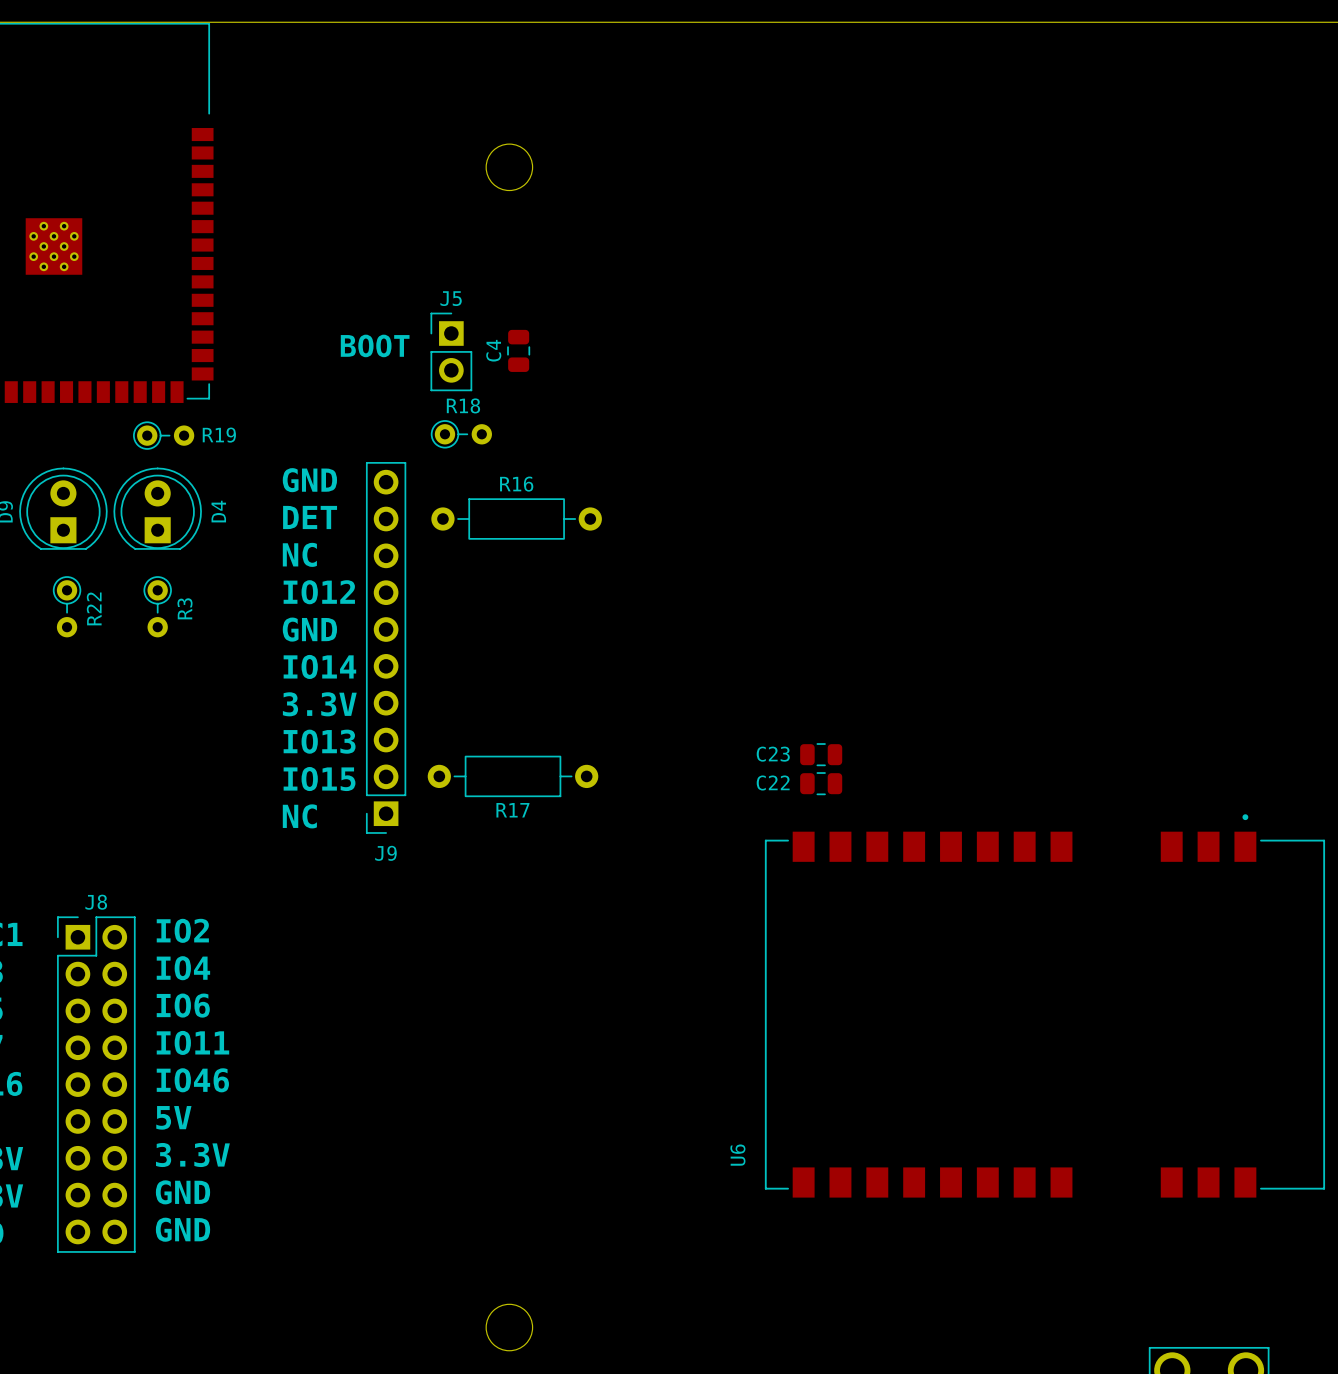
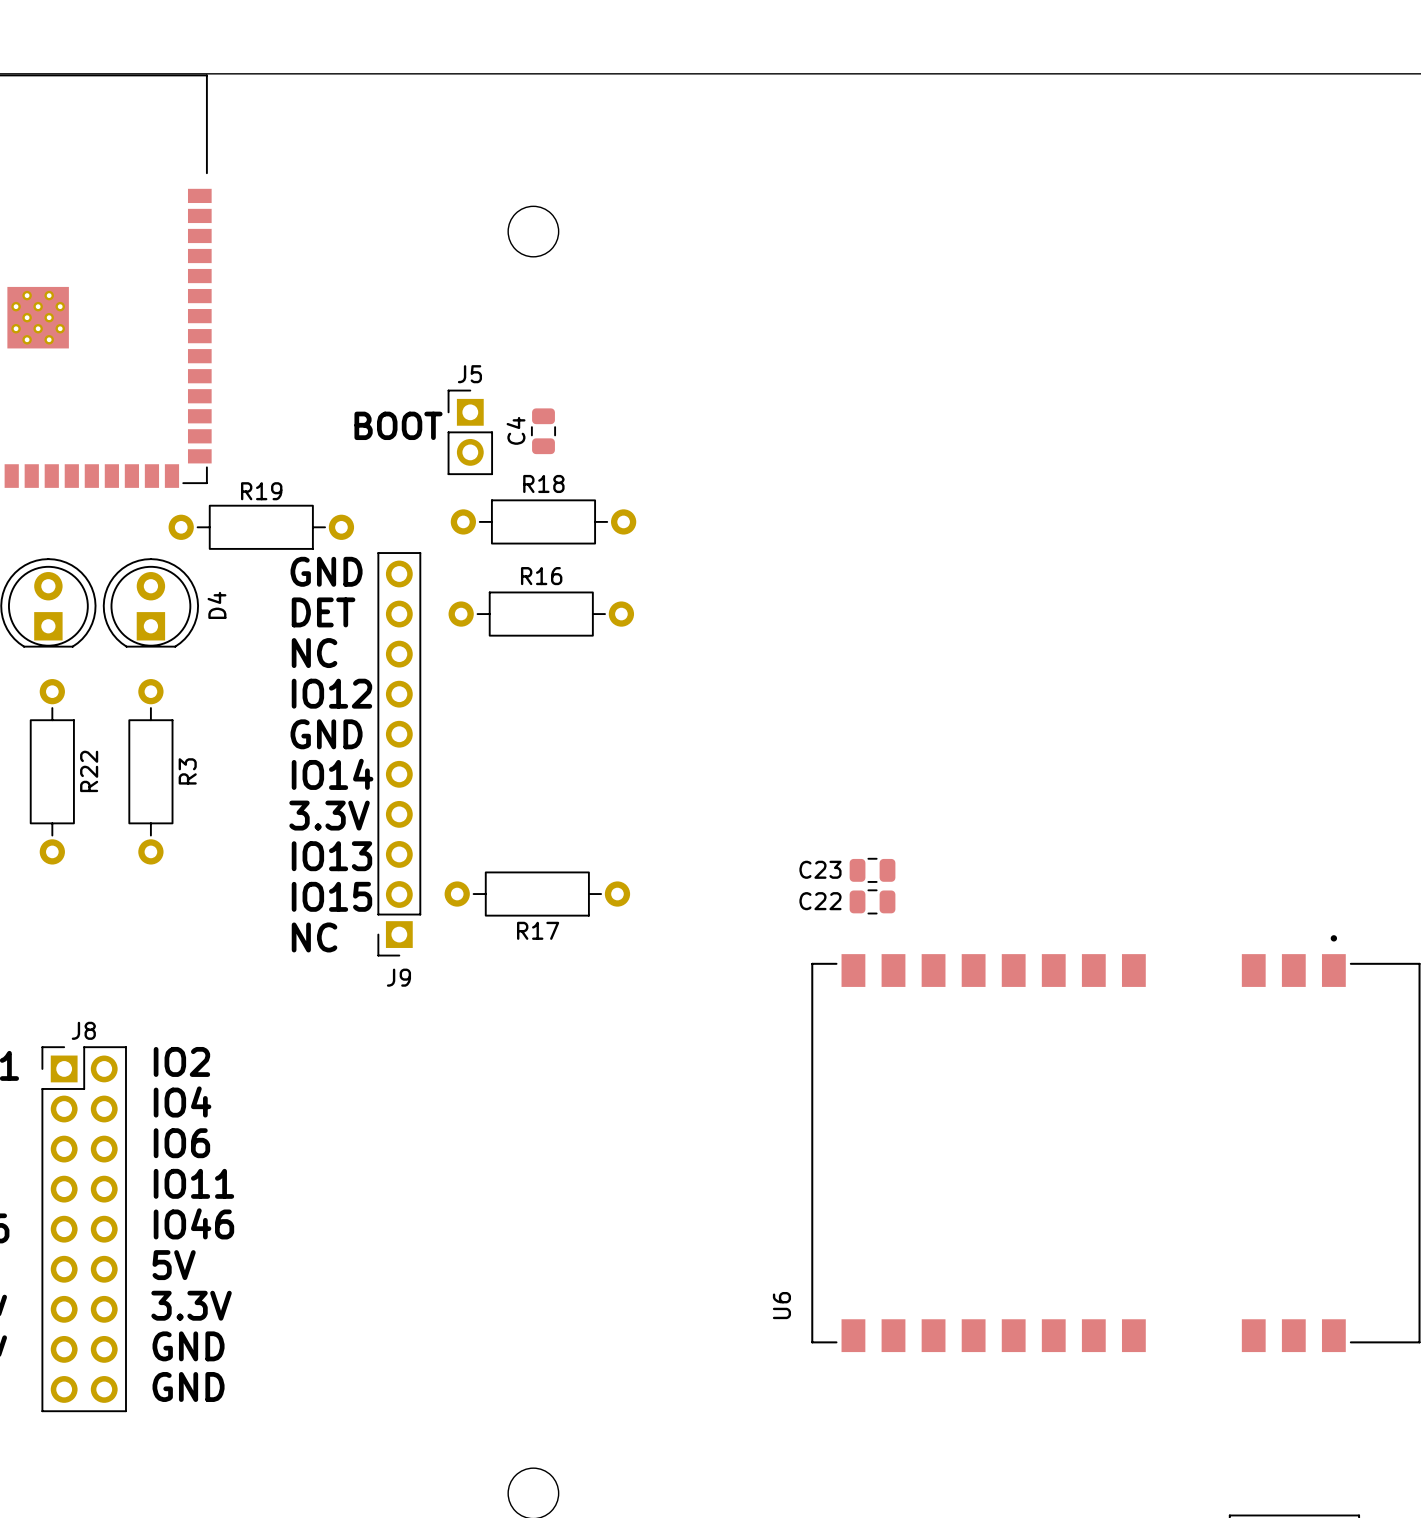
R18 footprint: [430, 420, 492, 449] -> [450, 499, 637, 545]
R19 footprint: [133, 421, 195, 450] -> [168, 504, 355, 550]
R19 name position: R19 (219, 435) -> R19 (261, 491)
R22 footprint: [52, 576, 82, 638] -> [29, 679, 75, 865]
R3 footprint: [143, 576, 172, 638] -> [128, 679, 174, 865]

